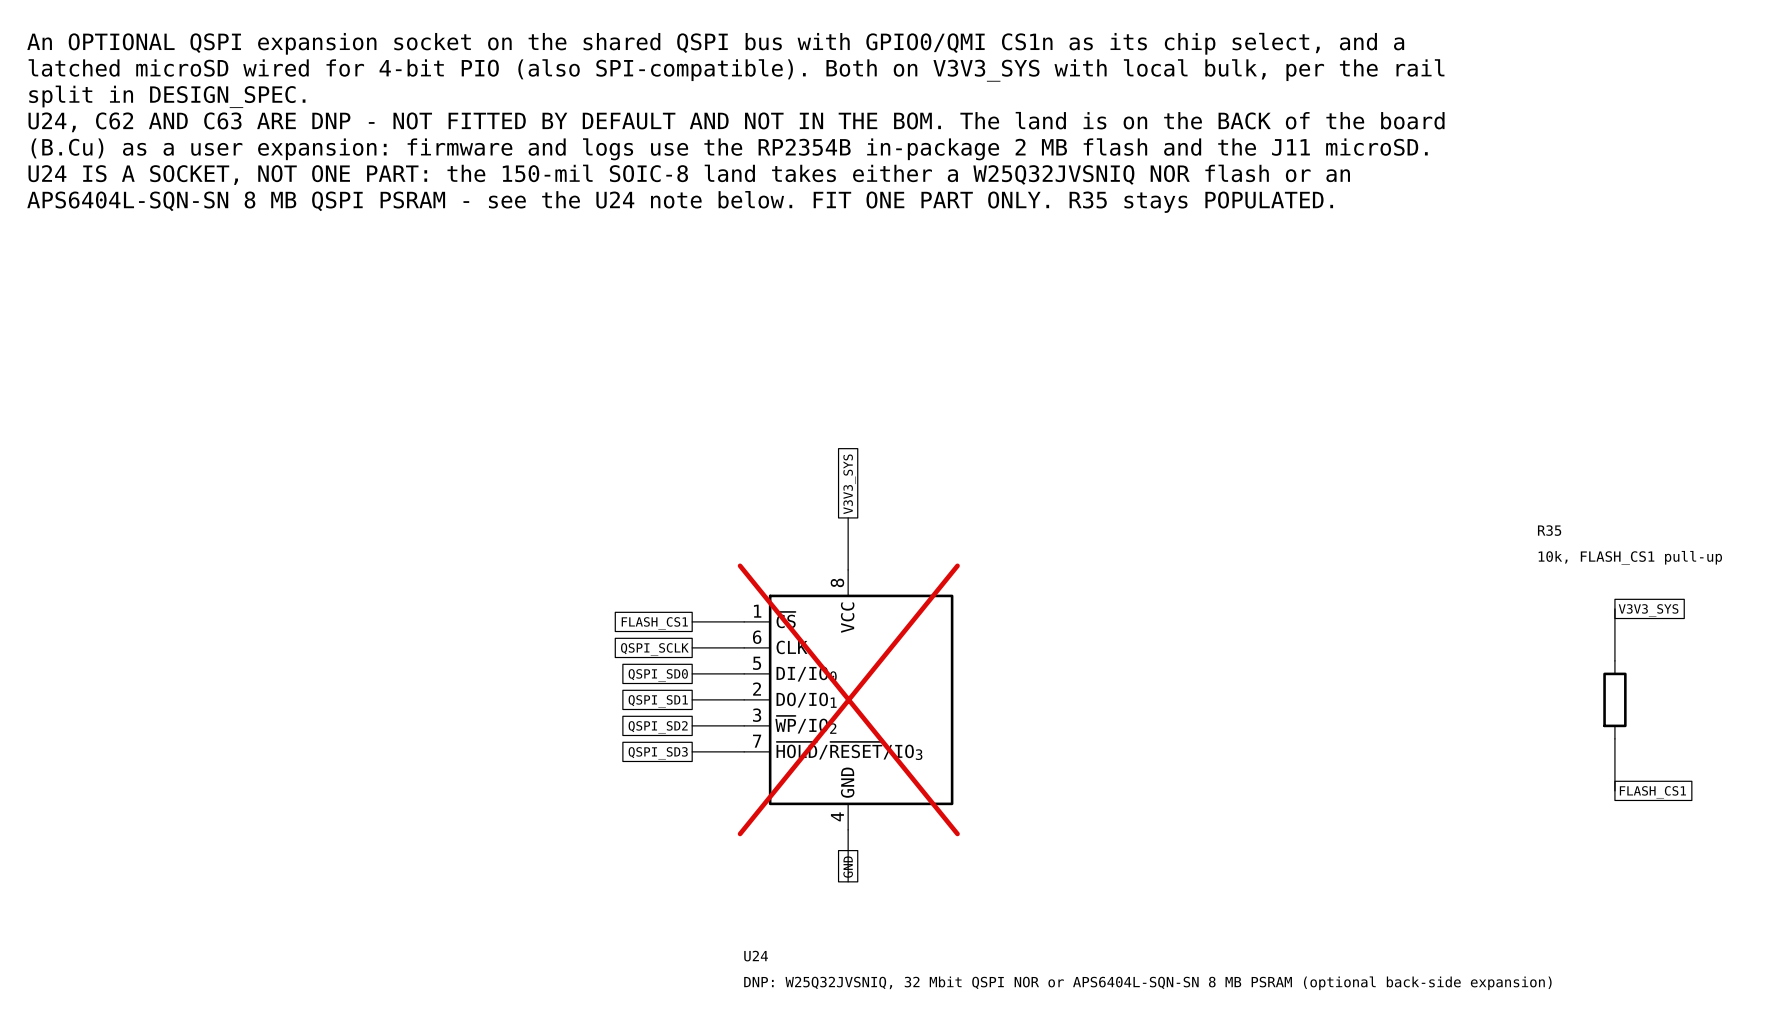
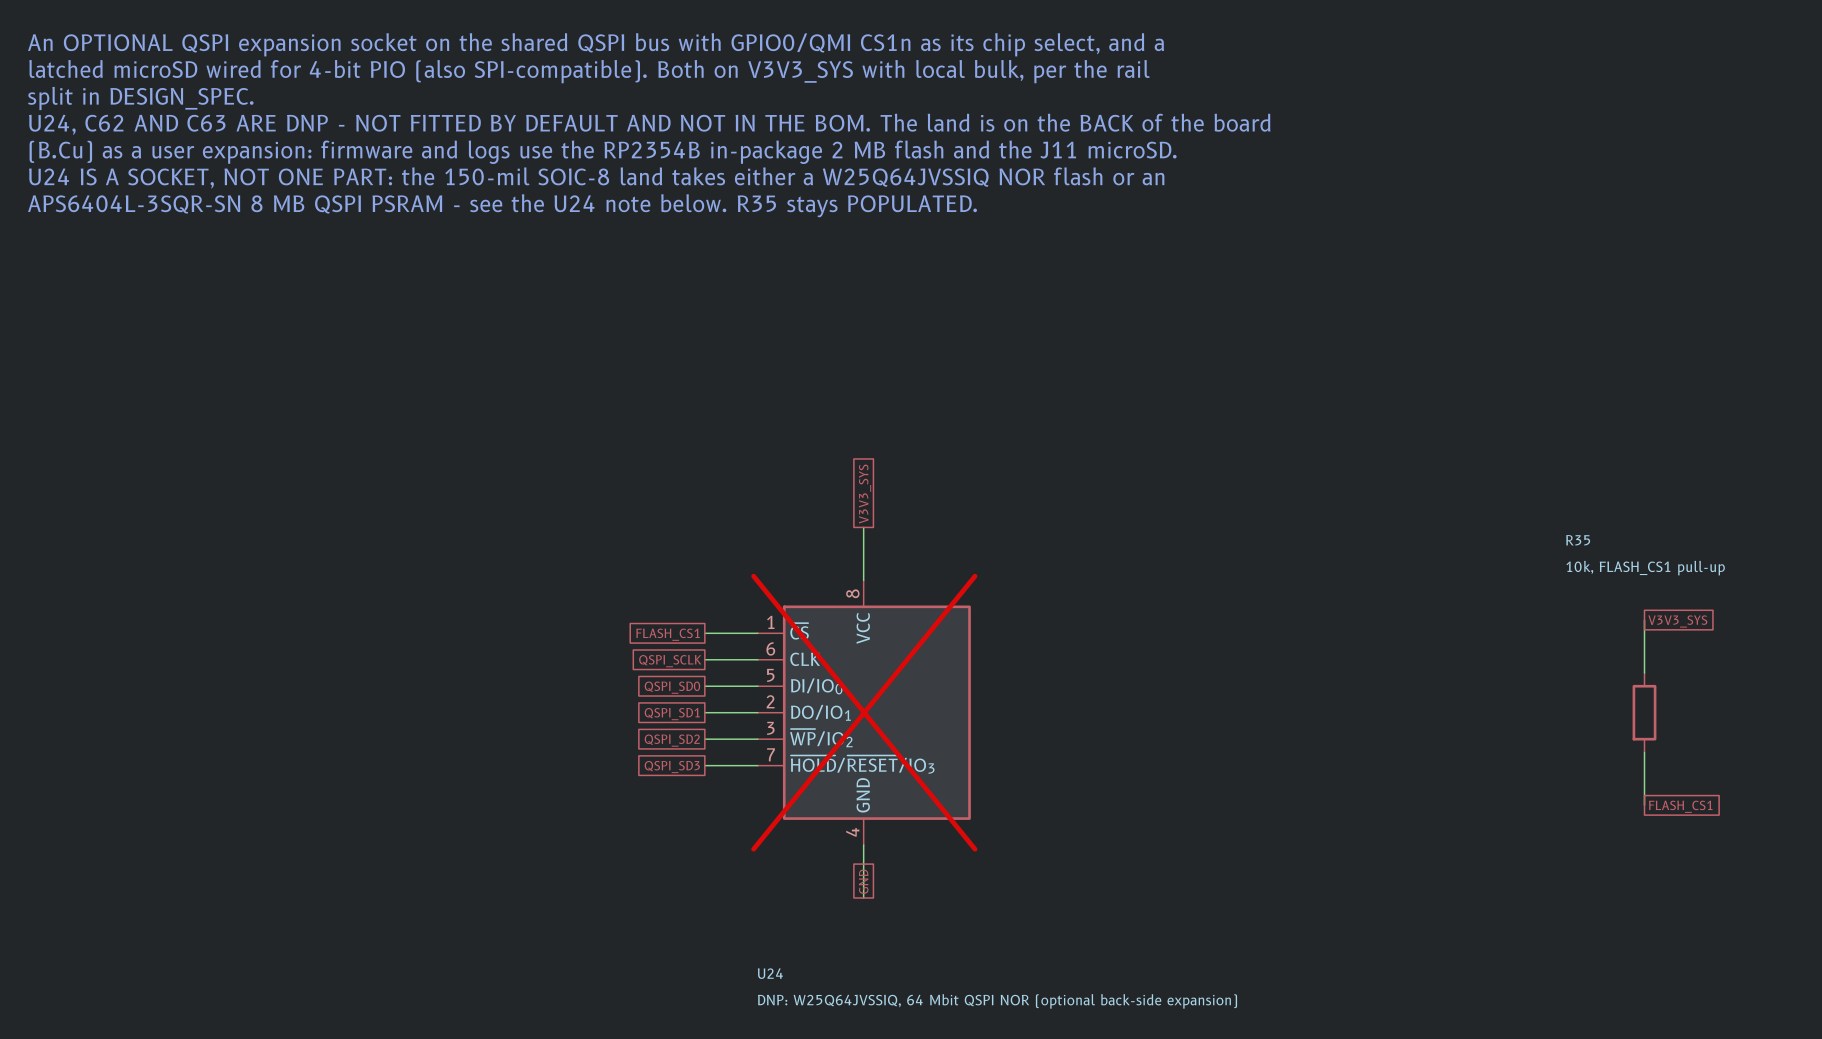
text: U24 IS A SOCKET, NOT ONE PART: the 150-mil SOIC-8 land takes either a W25Q32JVSNIQ NOR flash or an (689, 174) -> U24 IS A SOCKET, NOT ONE PART: the 150-mil SOIC-8 land takes either a W25Q64JVSSIQ NOR flash or an (596, 177)
text: APS6404L-SQN-SN 8 MB QSPI PSRAM - see the U24 note below. FIT ONE PART ONLY. R35 stays POPULATED. (680, 201) -> APS6404L-3SQR-SN 8 MB QSPI PSRAM - see the U24 note below. R35 stays POPULATED. (502, 205)
U24 value: DNP: W25Q32JVSNIQ, 32 Mbit QSPI NOR or APS6404L-SQN-SN 8 MB PSRAM (optional back-side expansion) (1147, 983) -> DNP: W25Q64JVSSIQ, 64 Mbit QSPI NOR (optional back-side expansion) (997, 1001)

